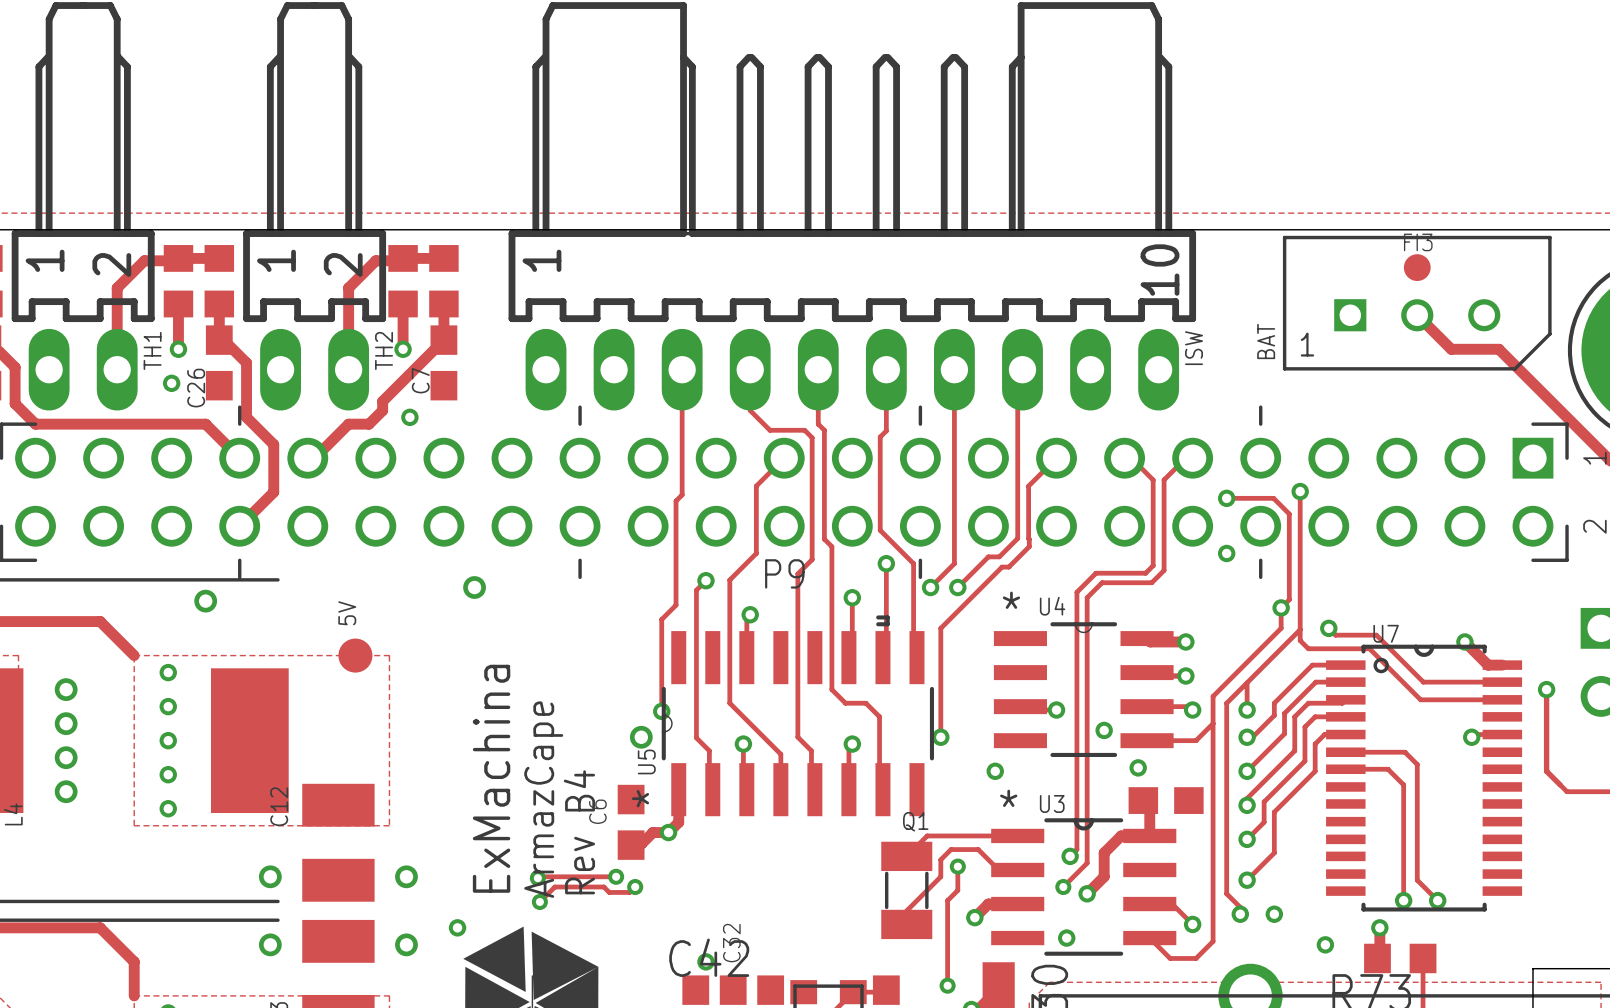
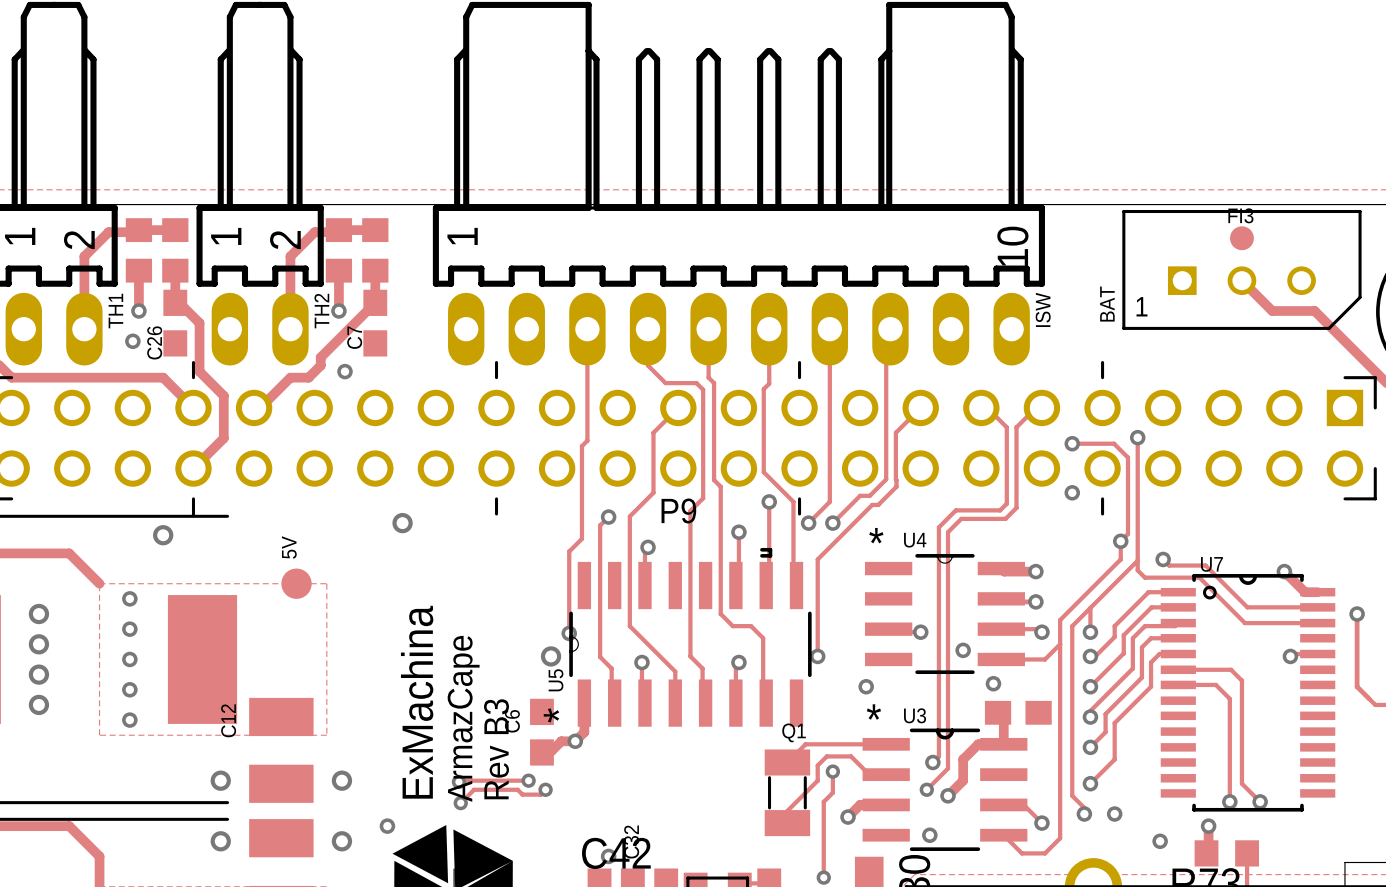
text: Rev B4 (579, 832) -> Rev B3 (496, 749)

